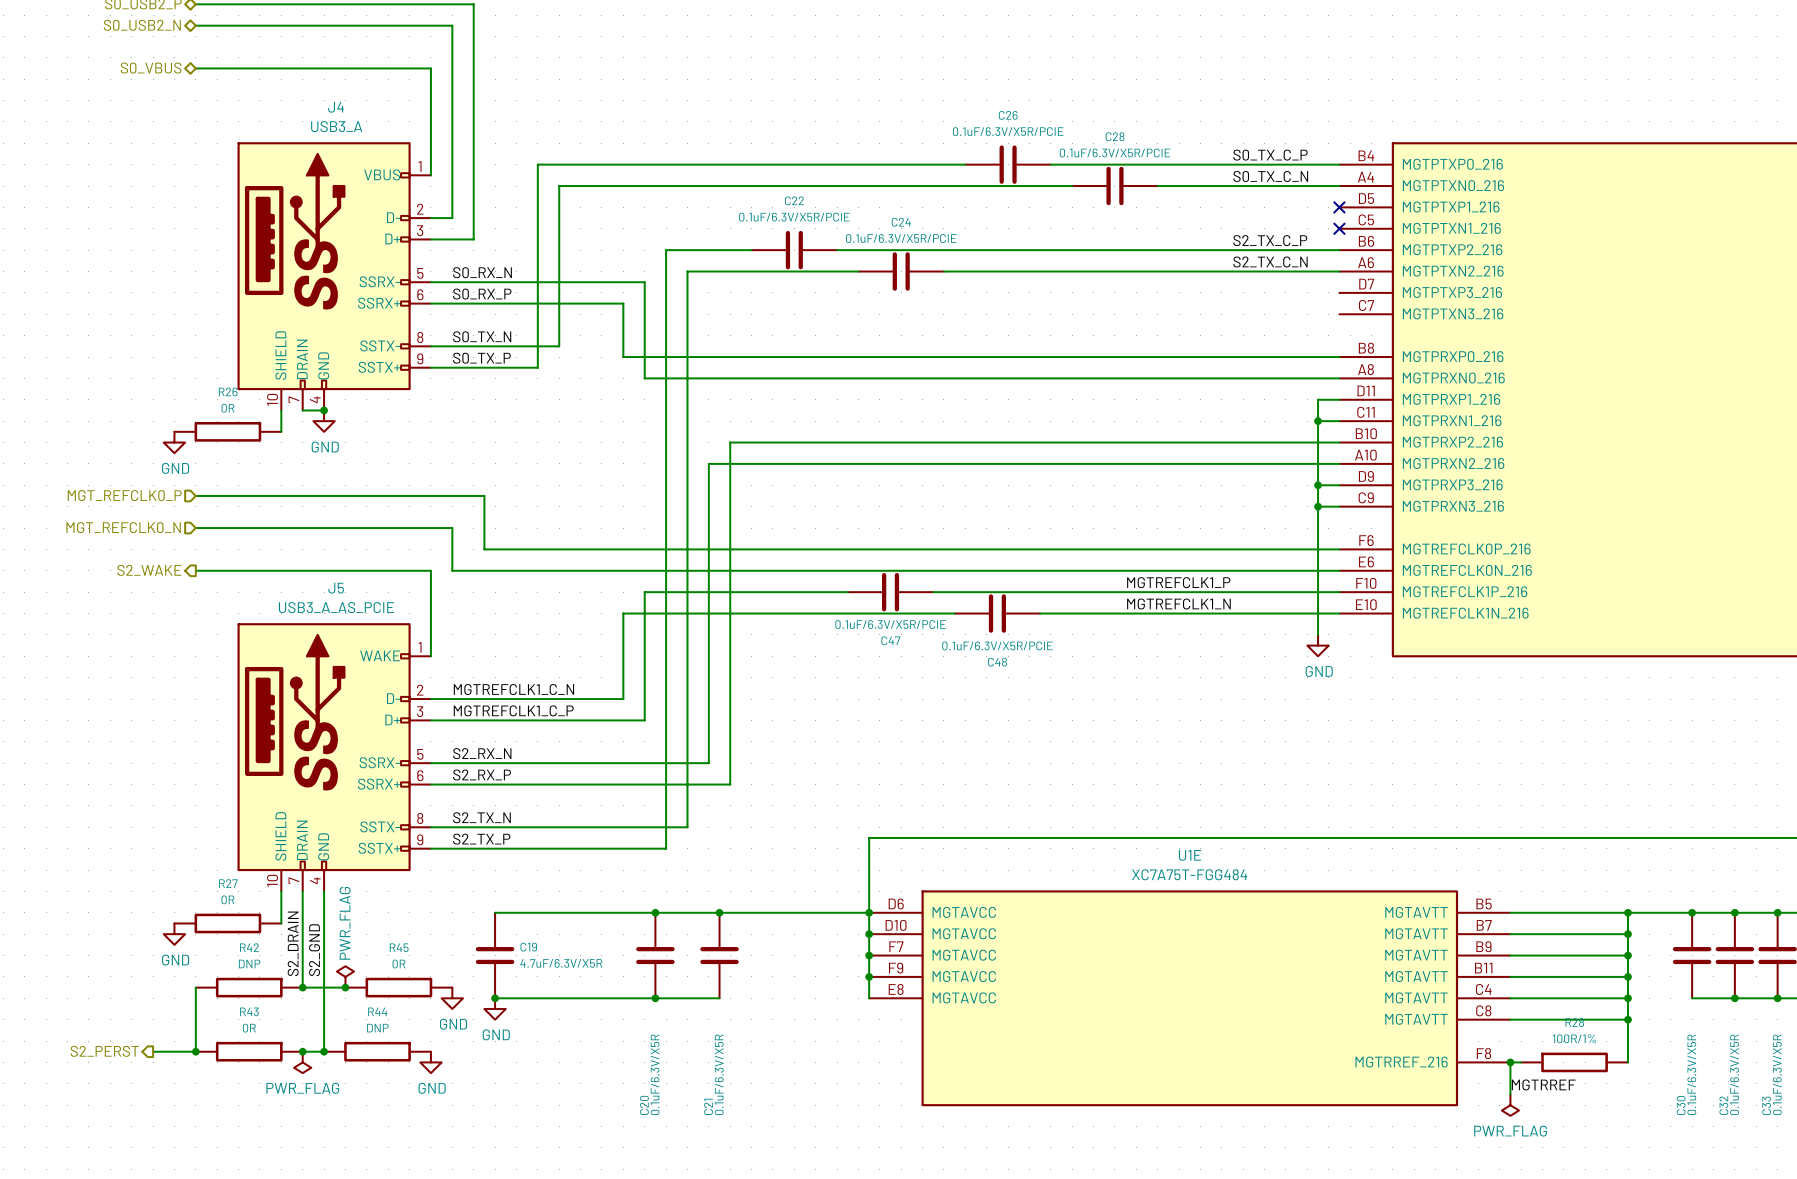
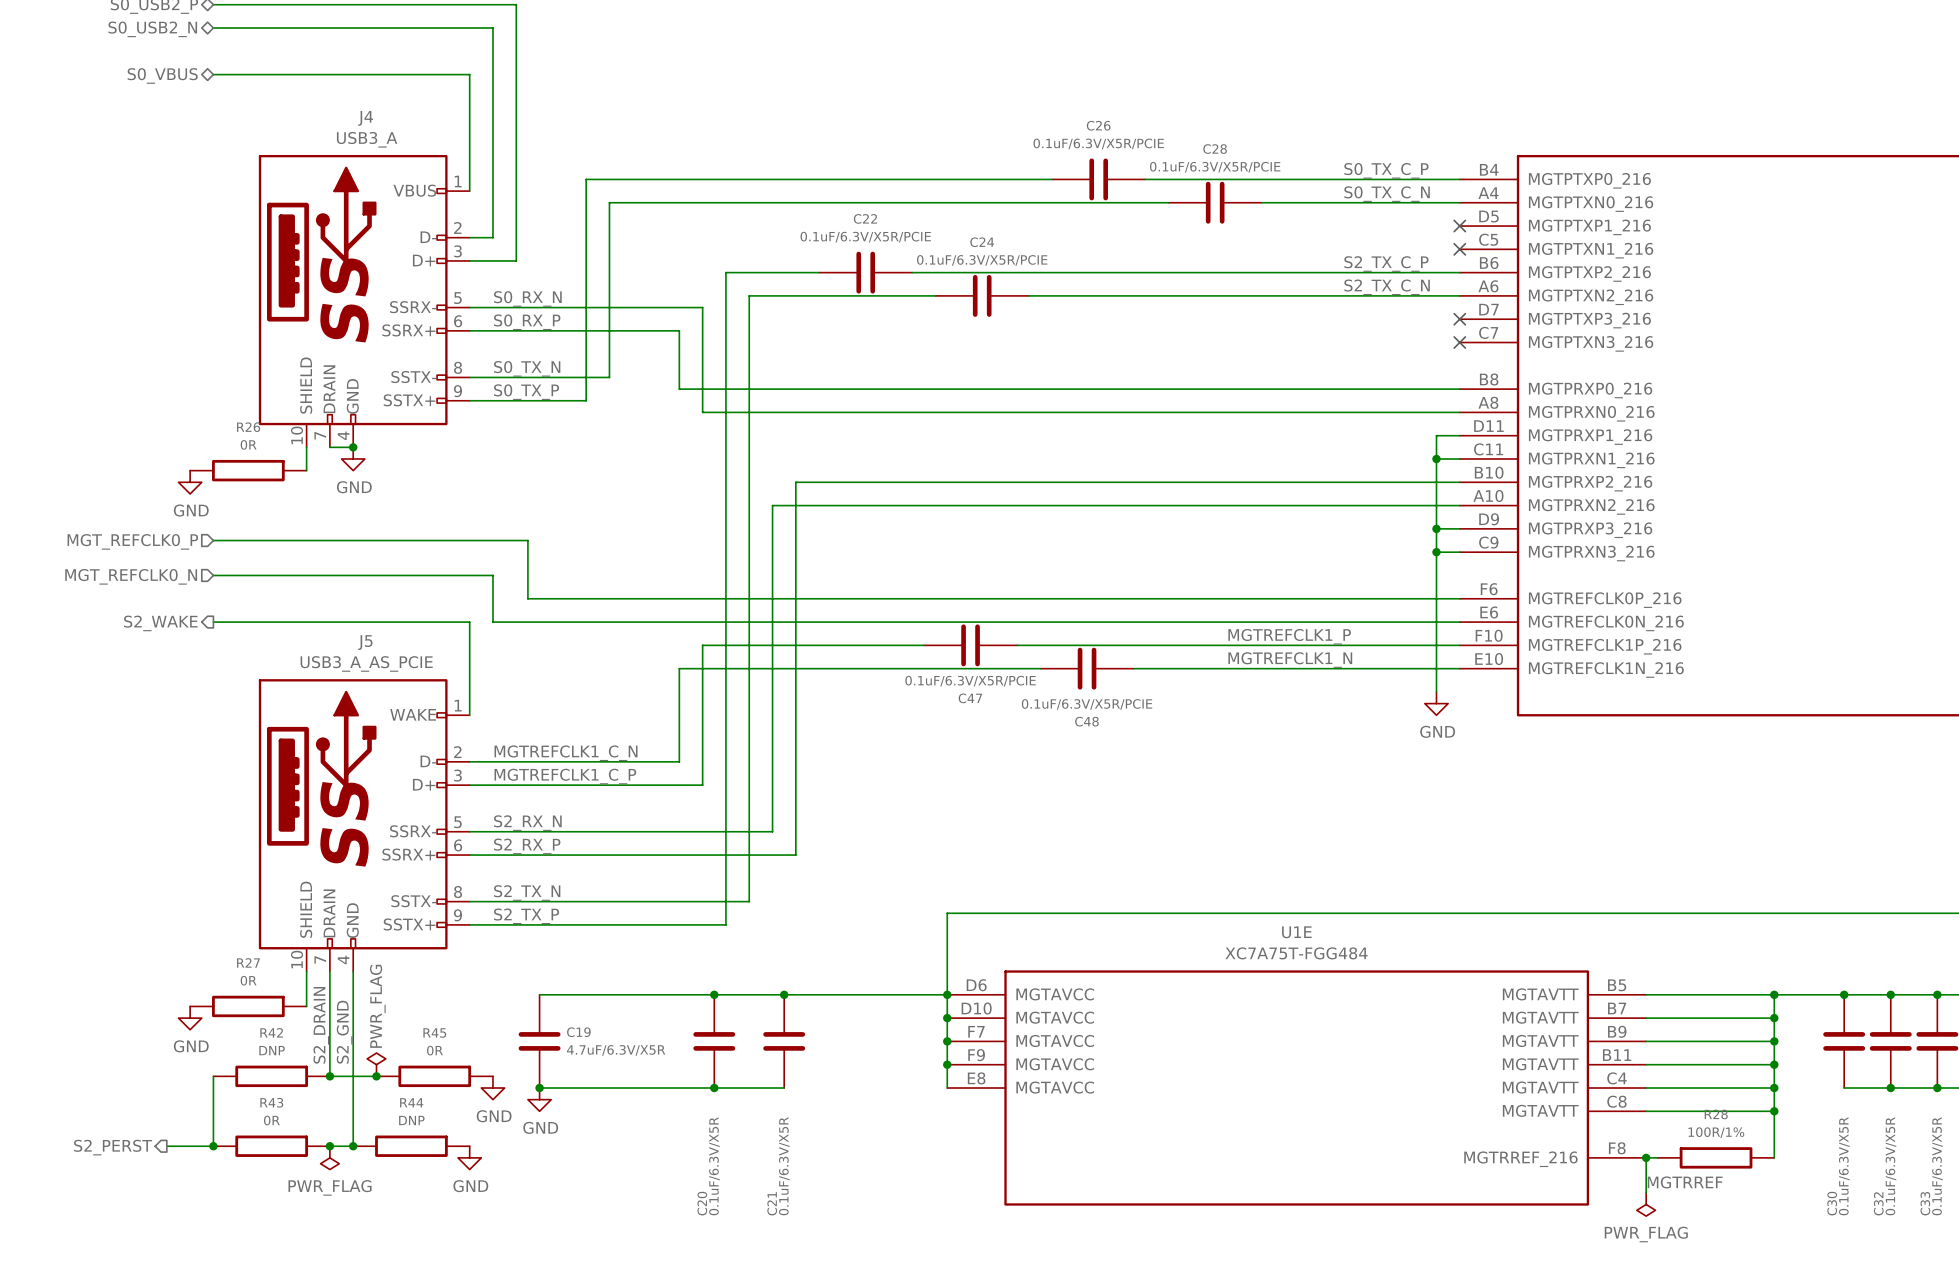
no-connect mark: none -> (1459, 319)
no-connect mark: none -> (1459, 342)

